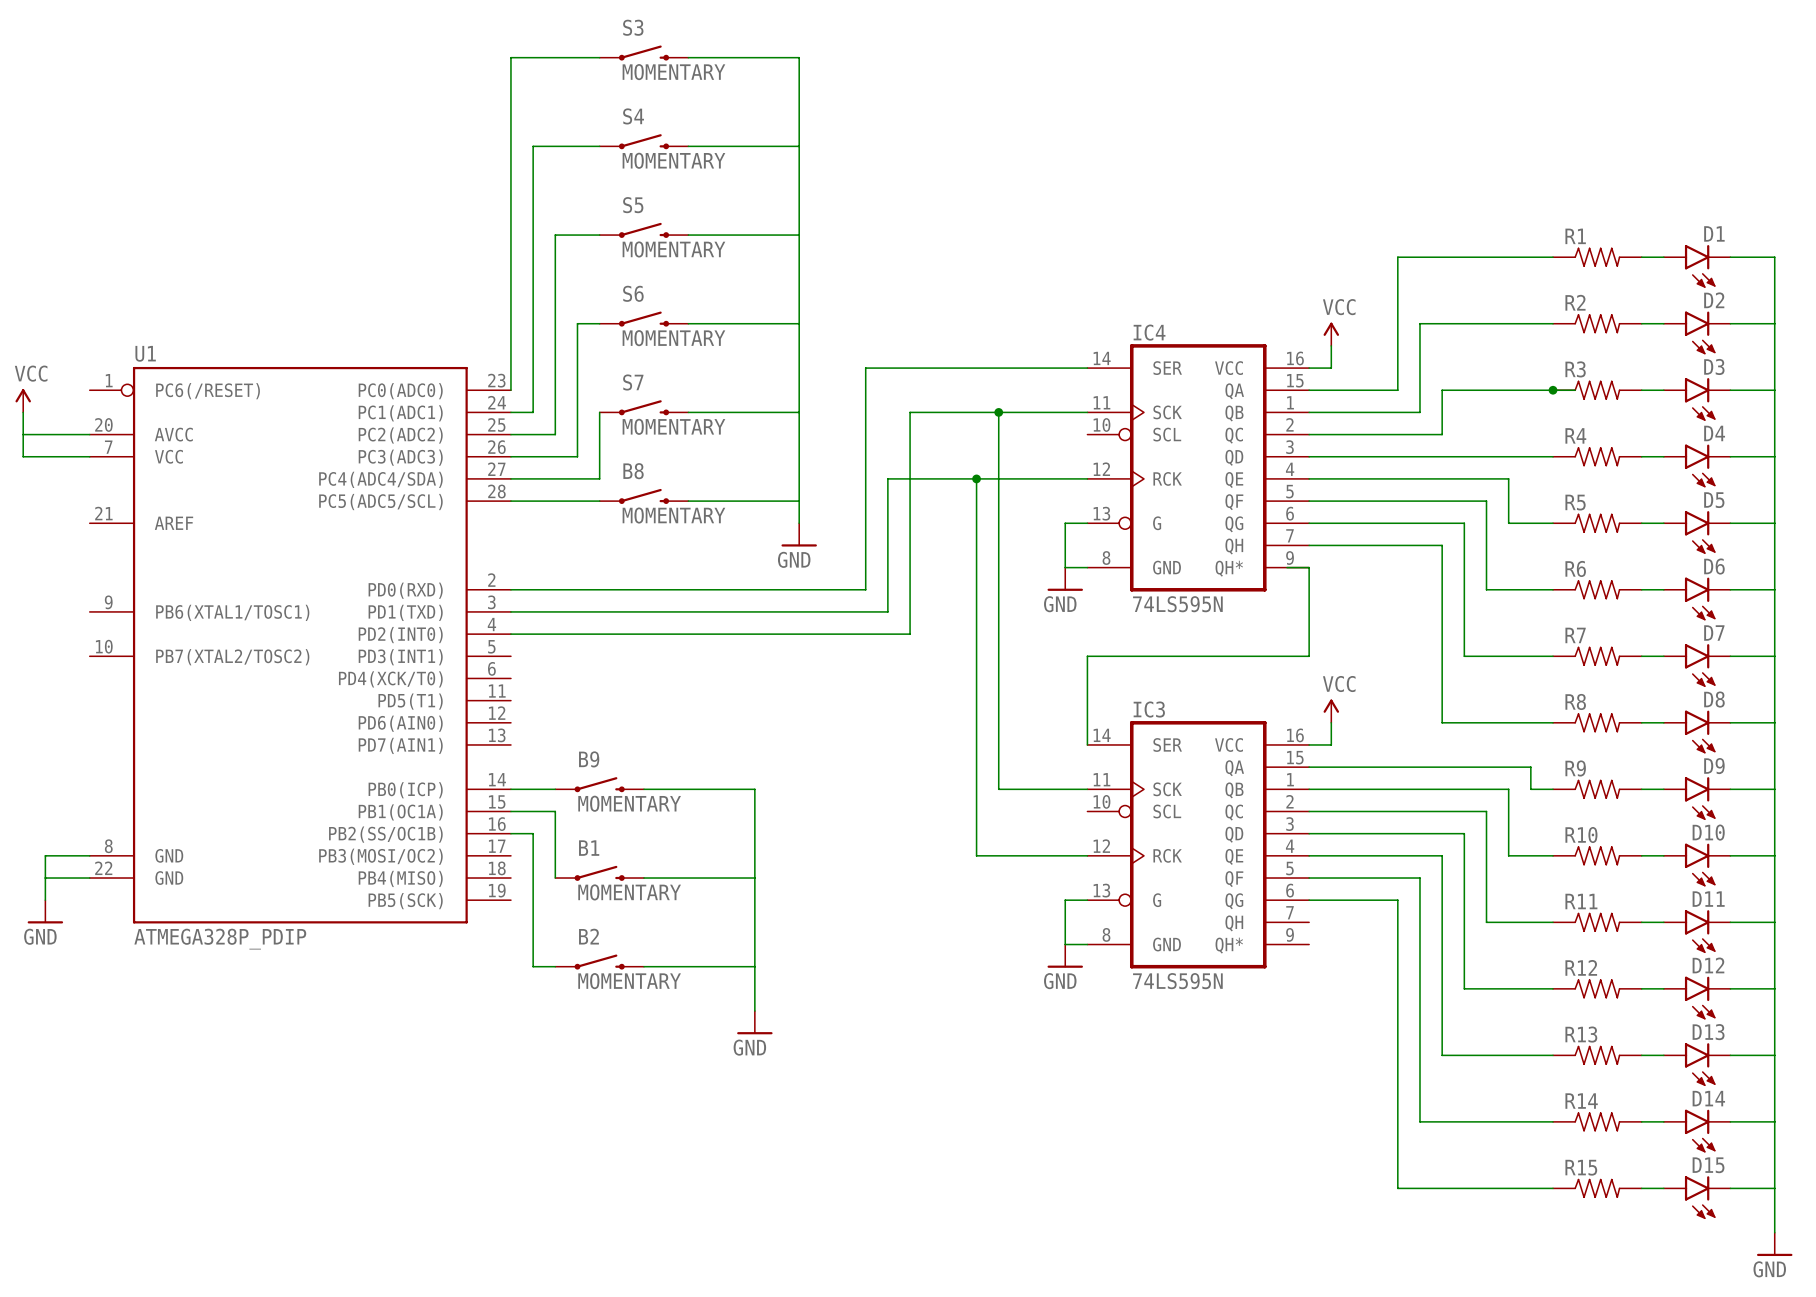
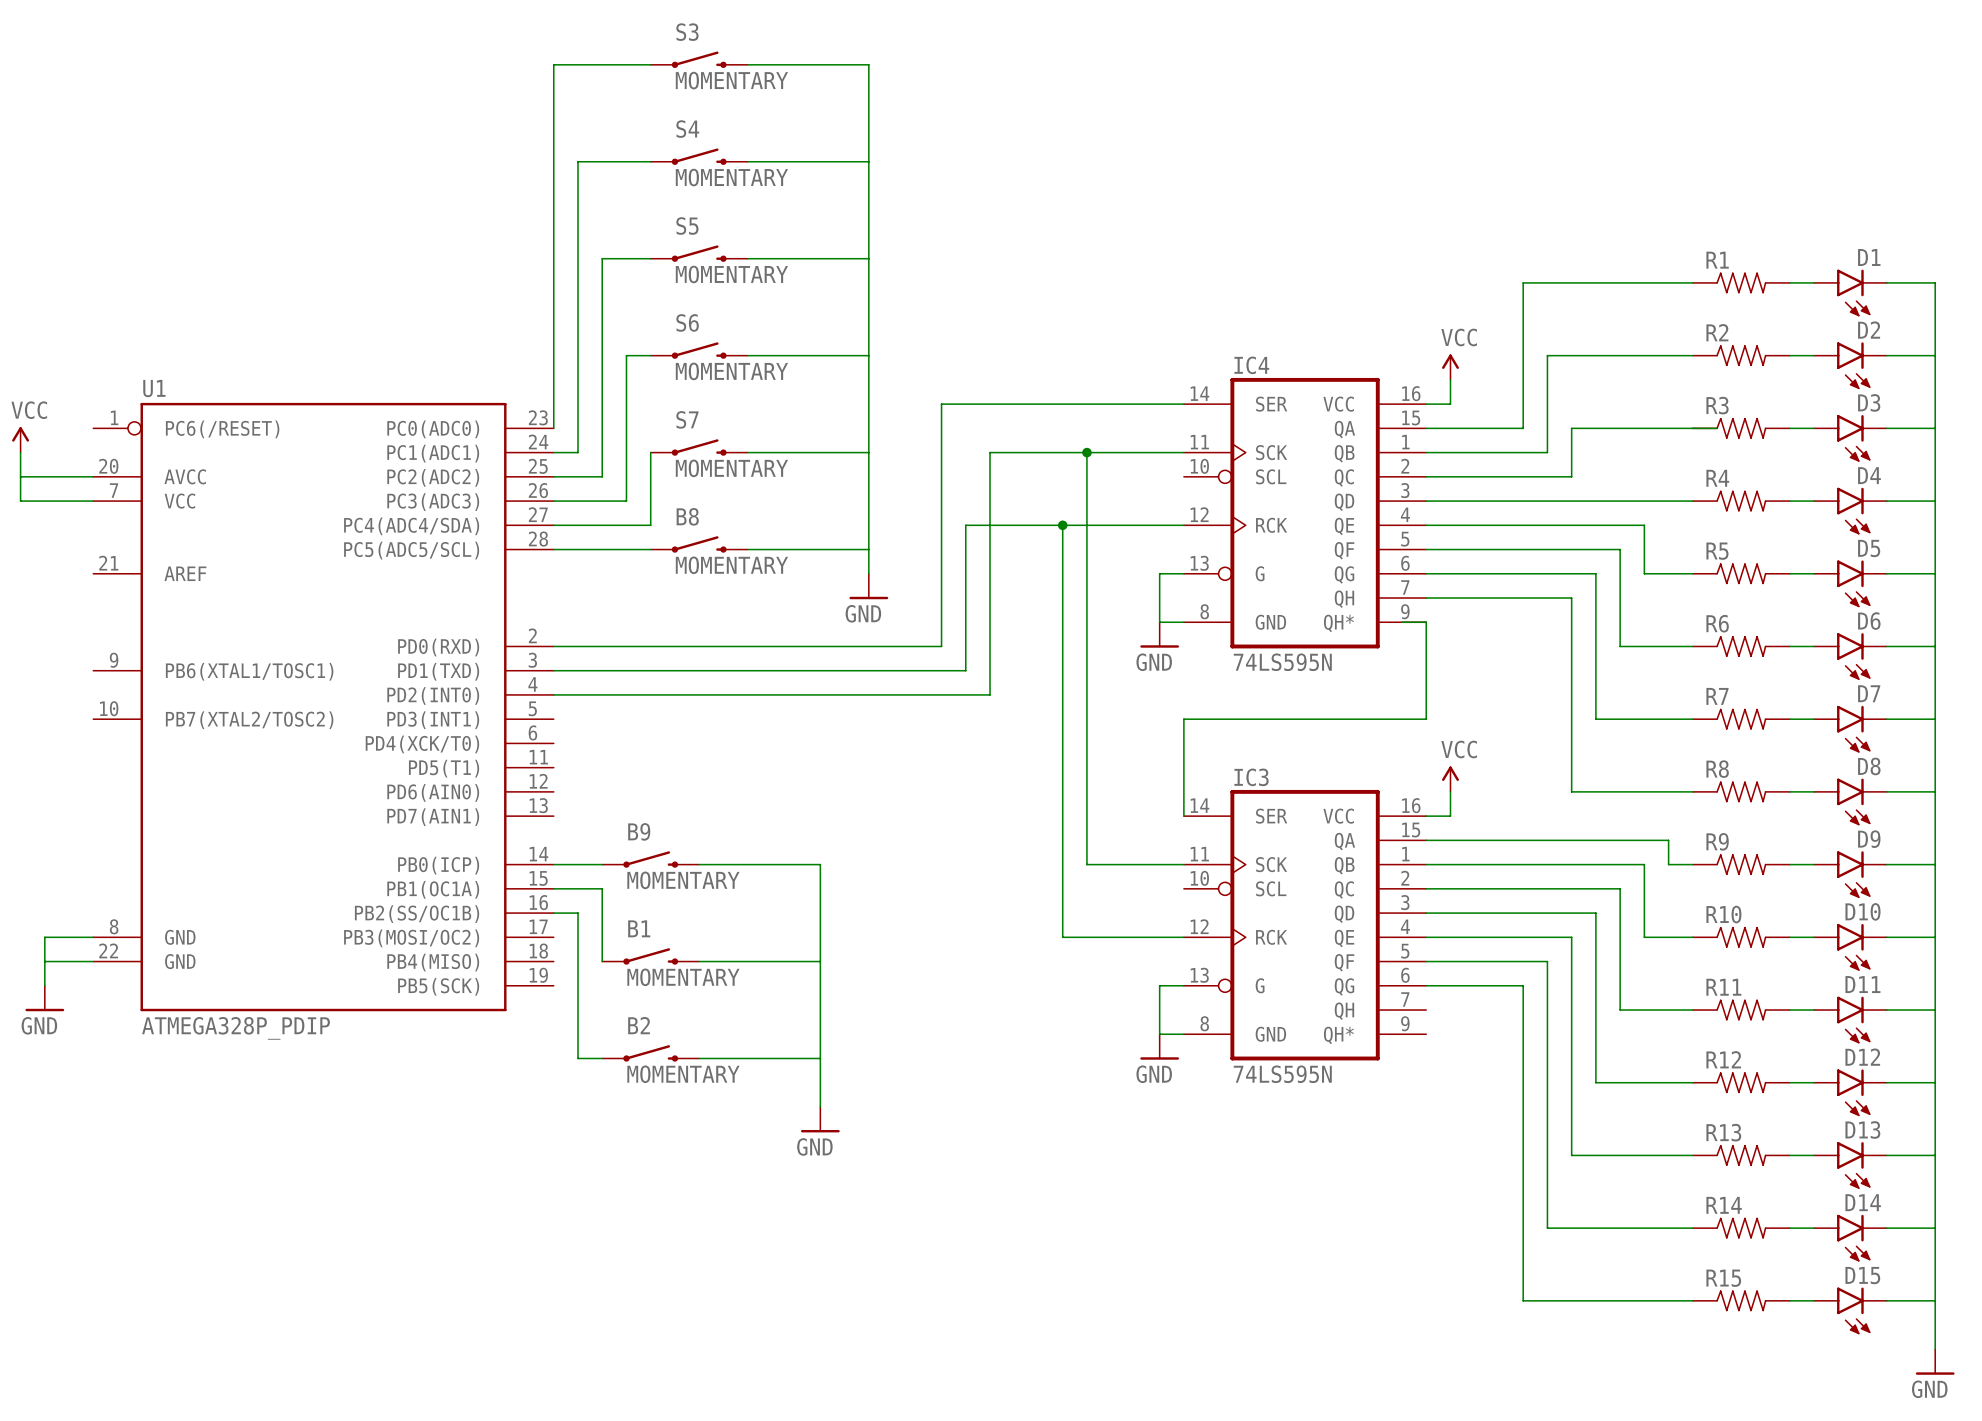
junction: (1553, 390) -> none

